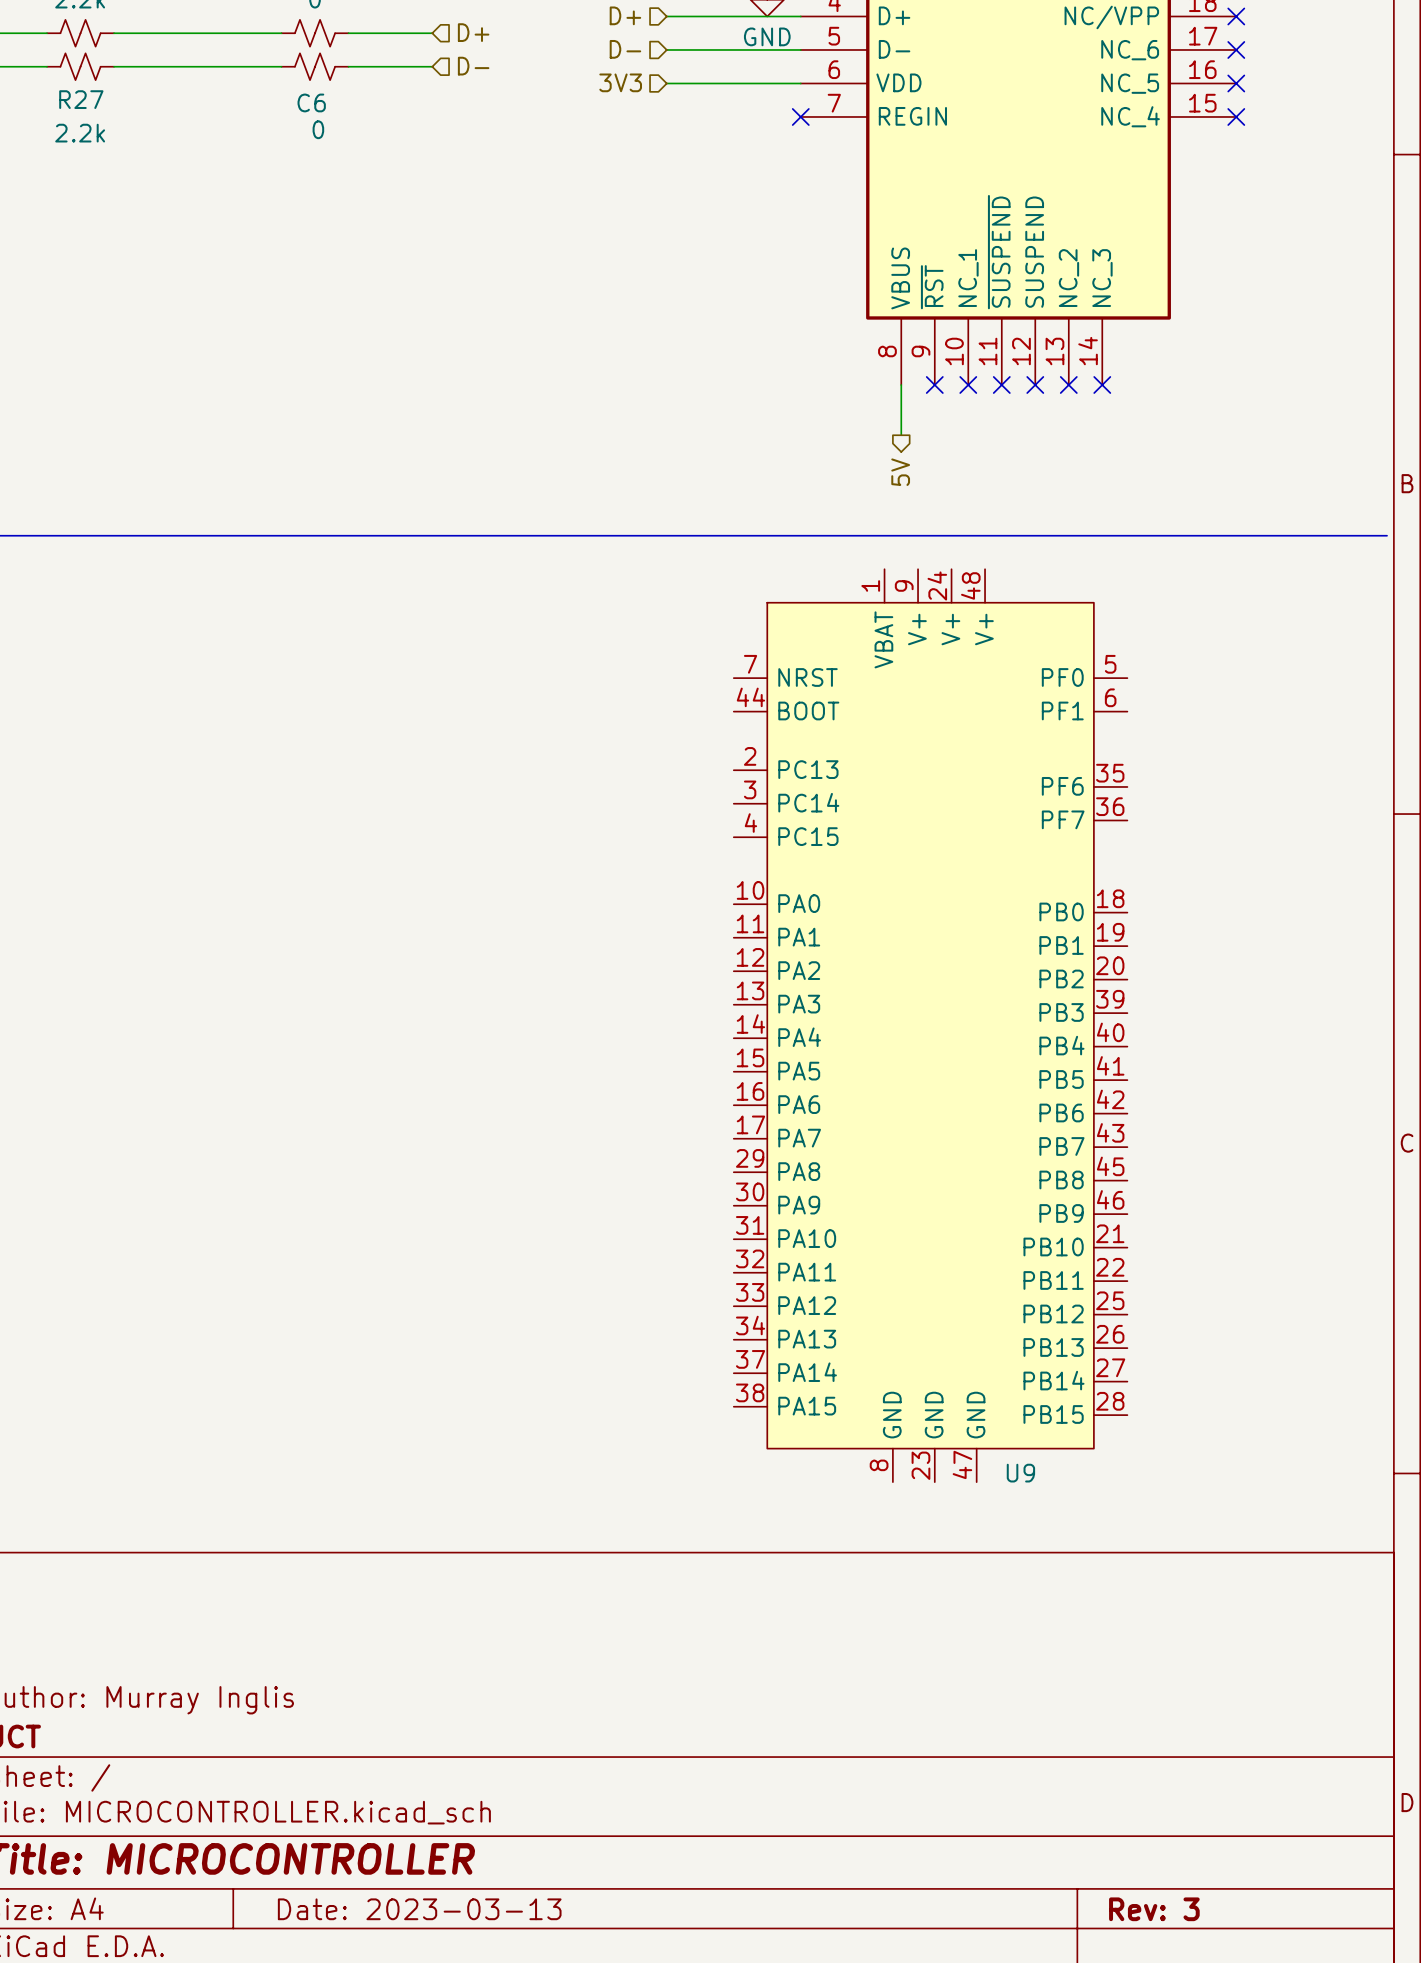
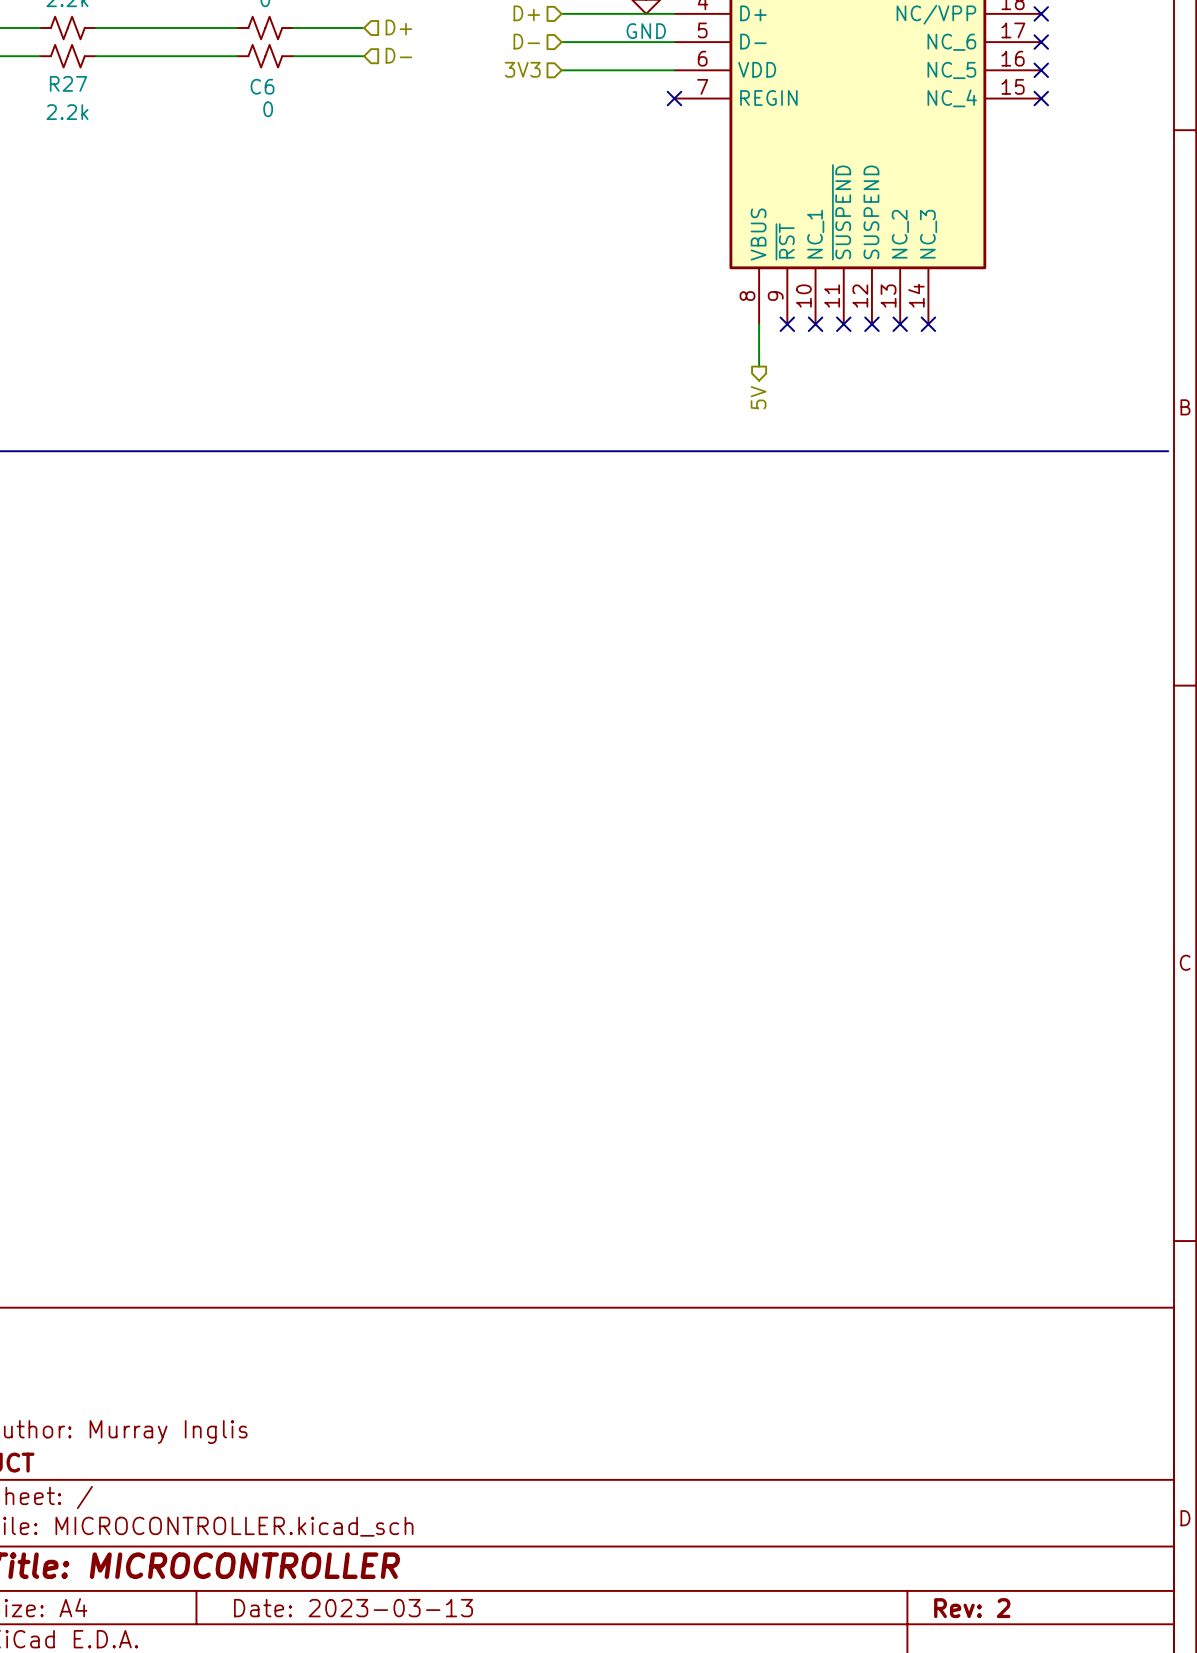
U9: (930, 1025) -> none
title block: Rev: 3 (1154, 1909) -> Rev: 2 (972, 1608)

